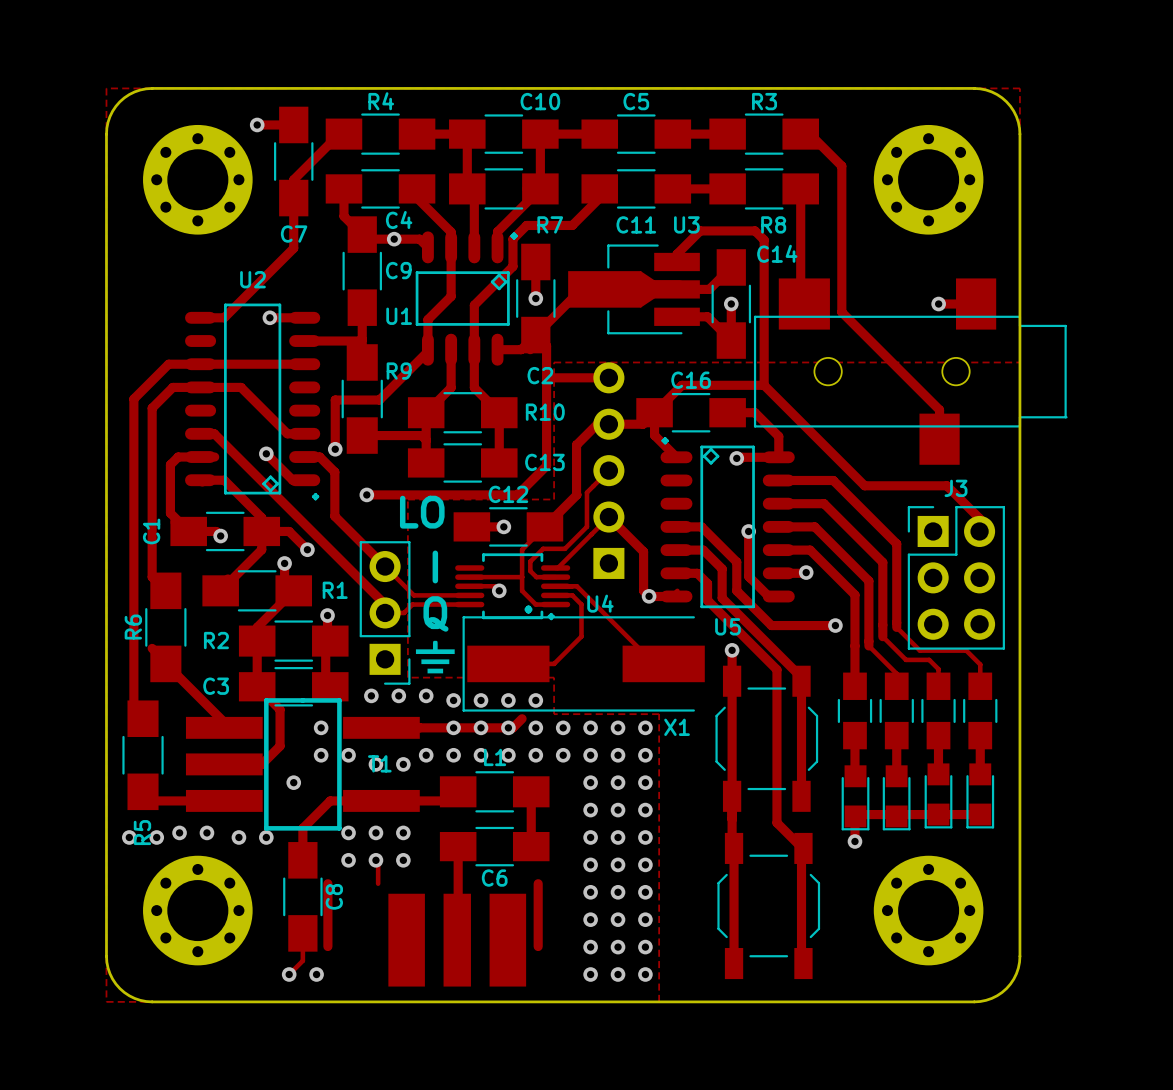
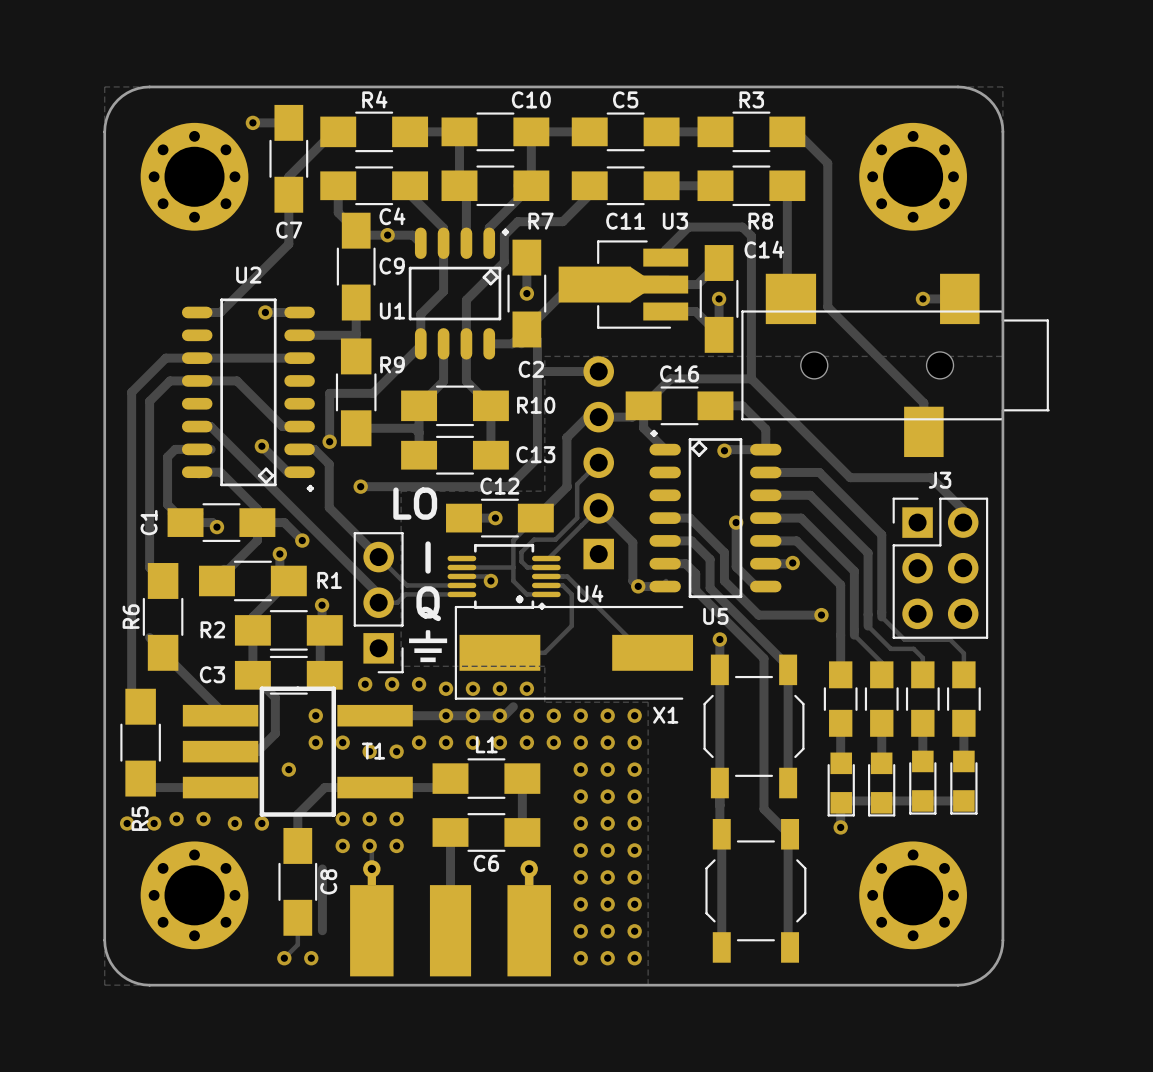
part footprint: [388, 893, 527, 987] -> [350, 860, 551, 977]

